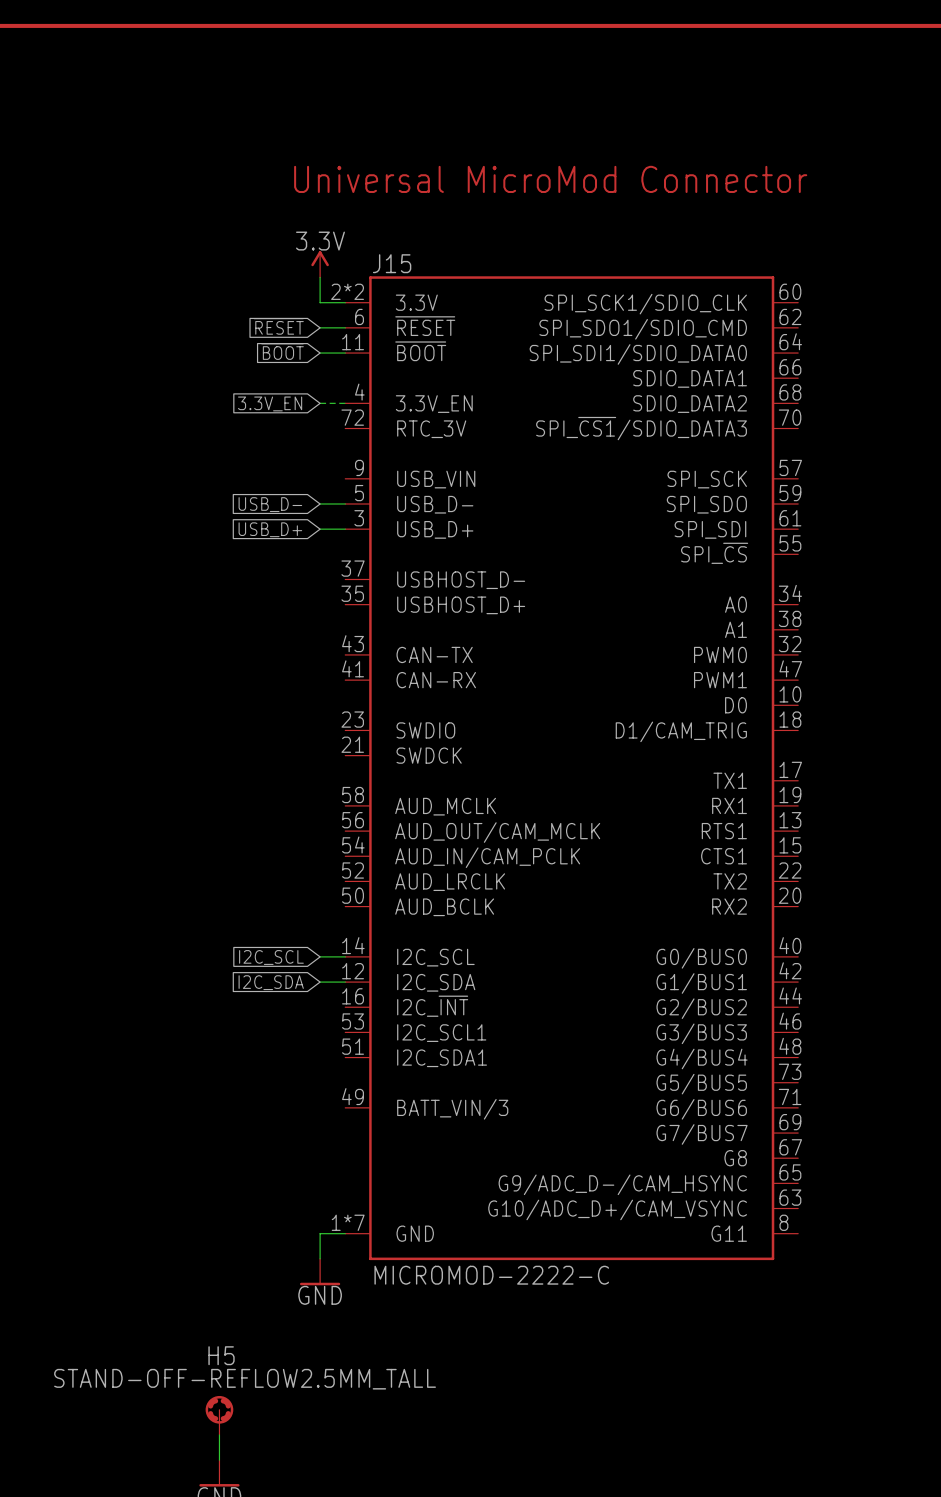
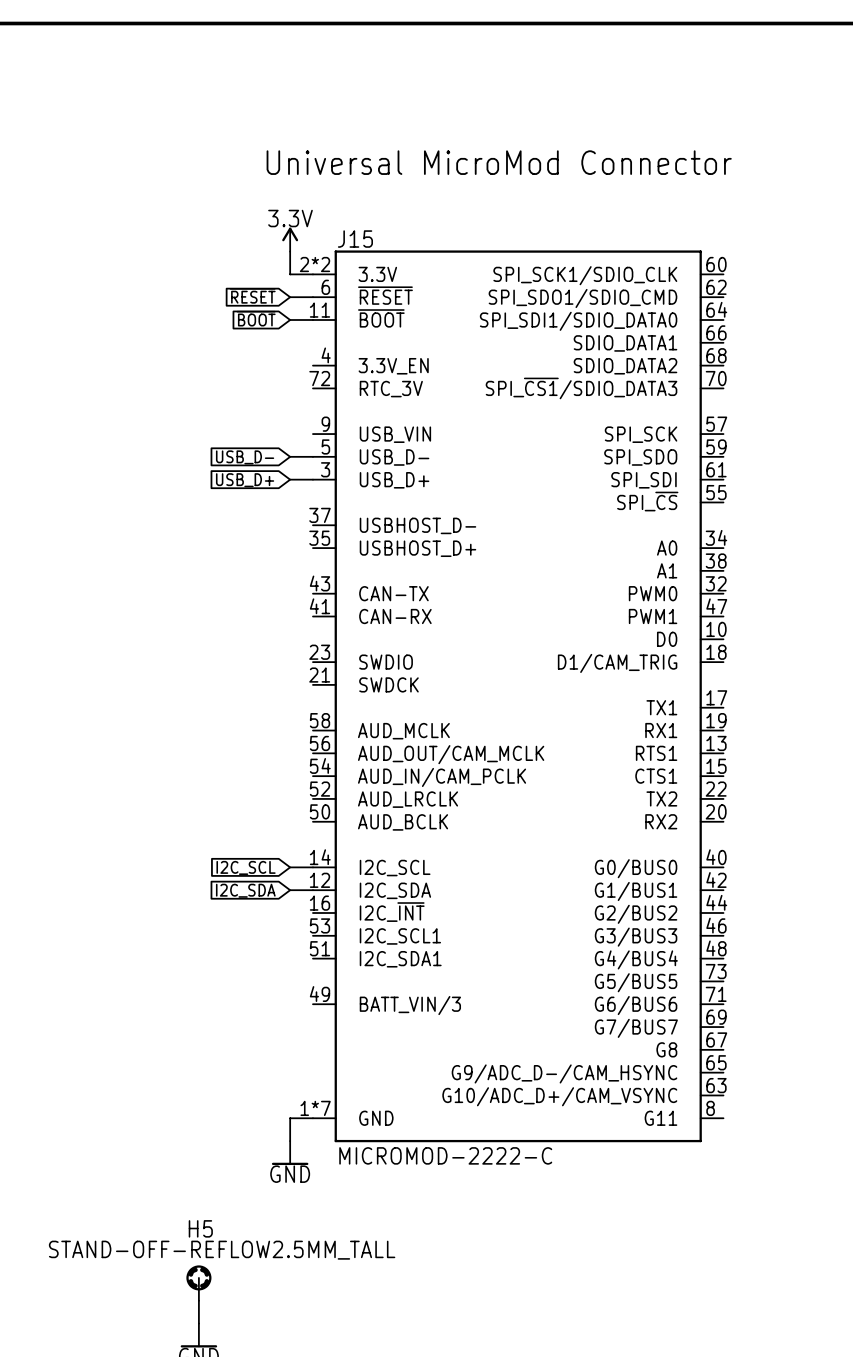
global label: 3.3V_EN (270, 403) -> none
wire: (320, 403) (345, 403) -> none

